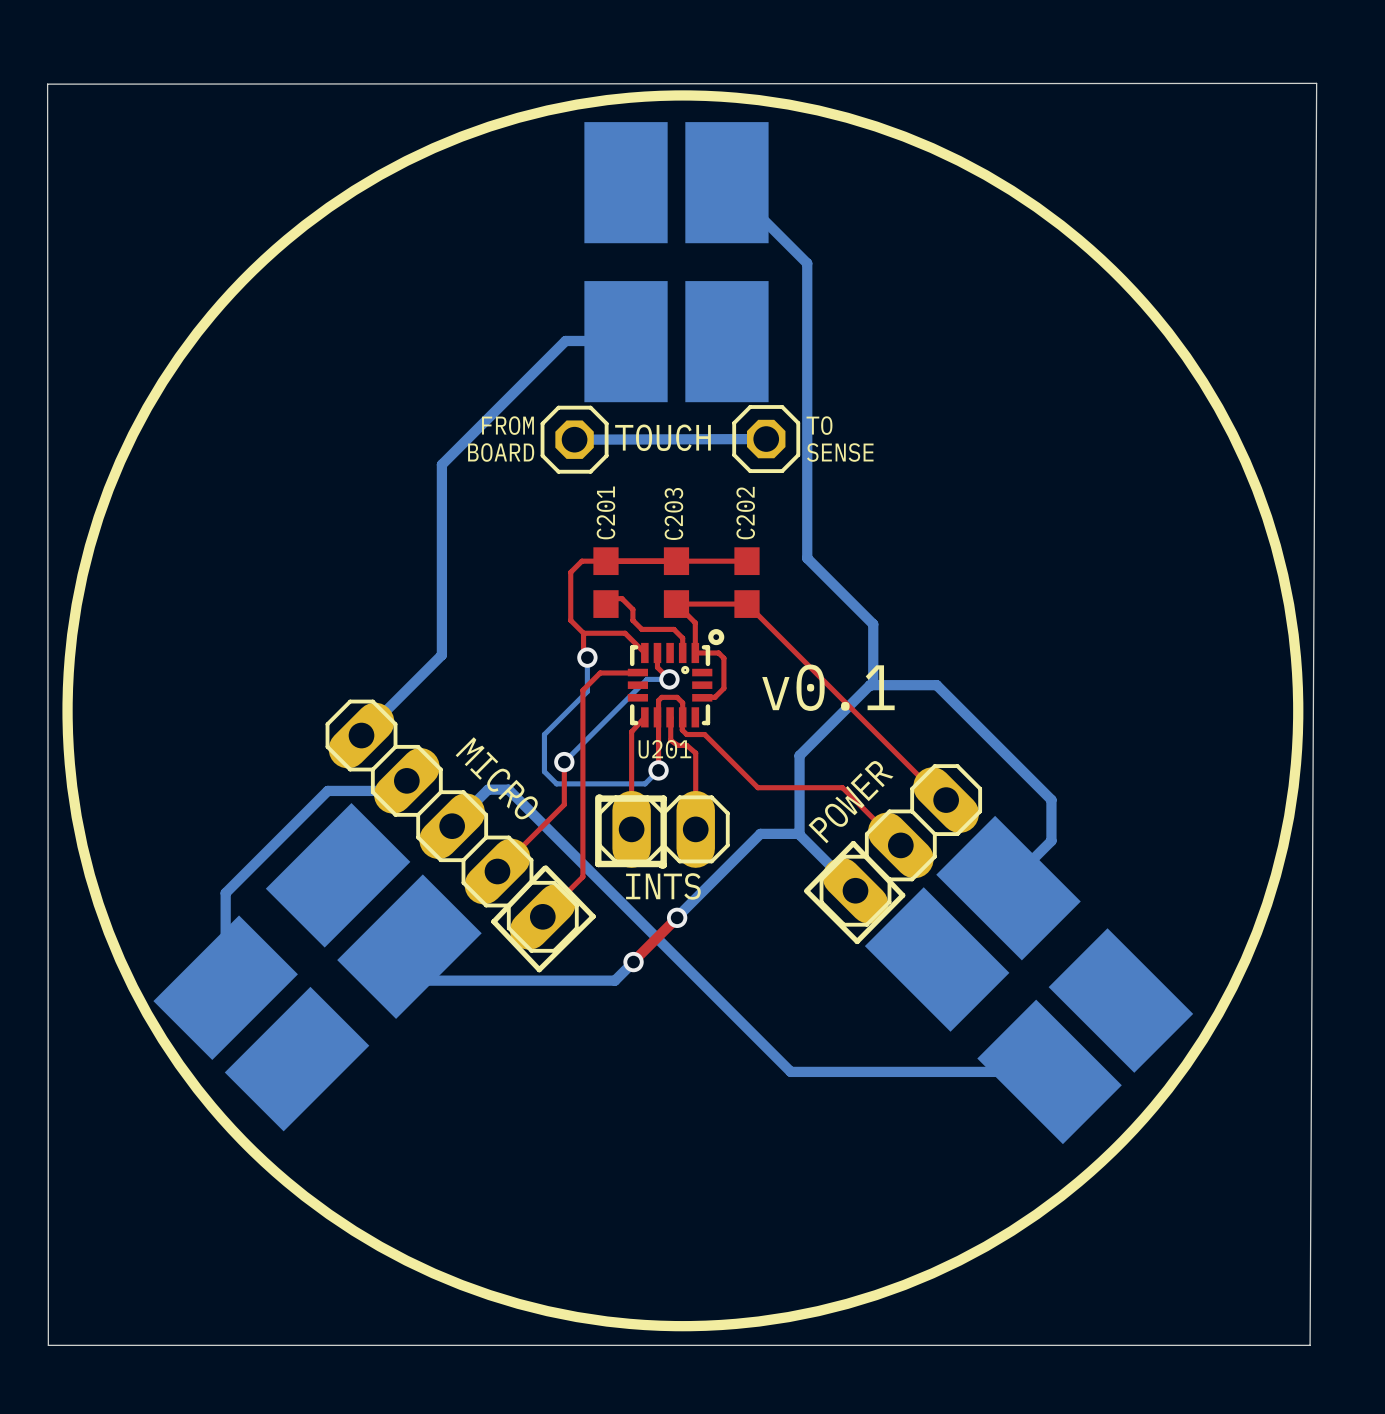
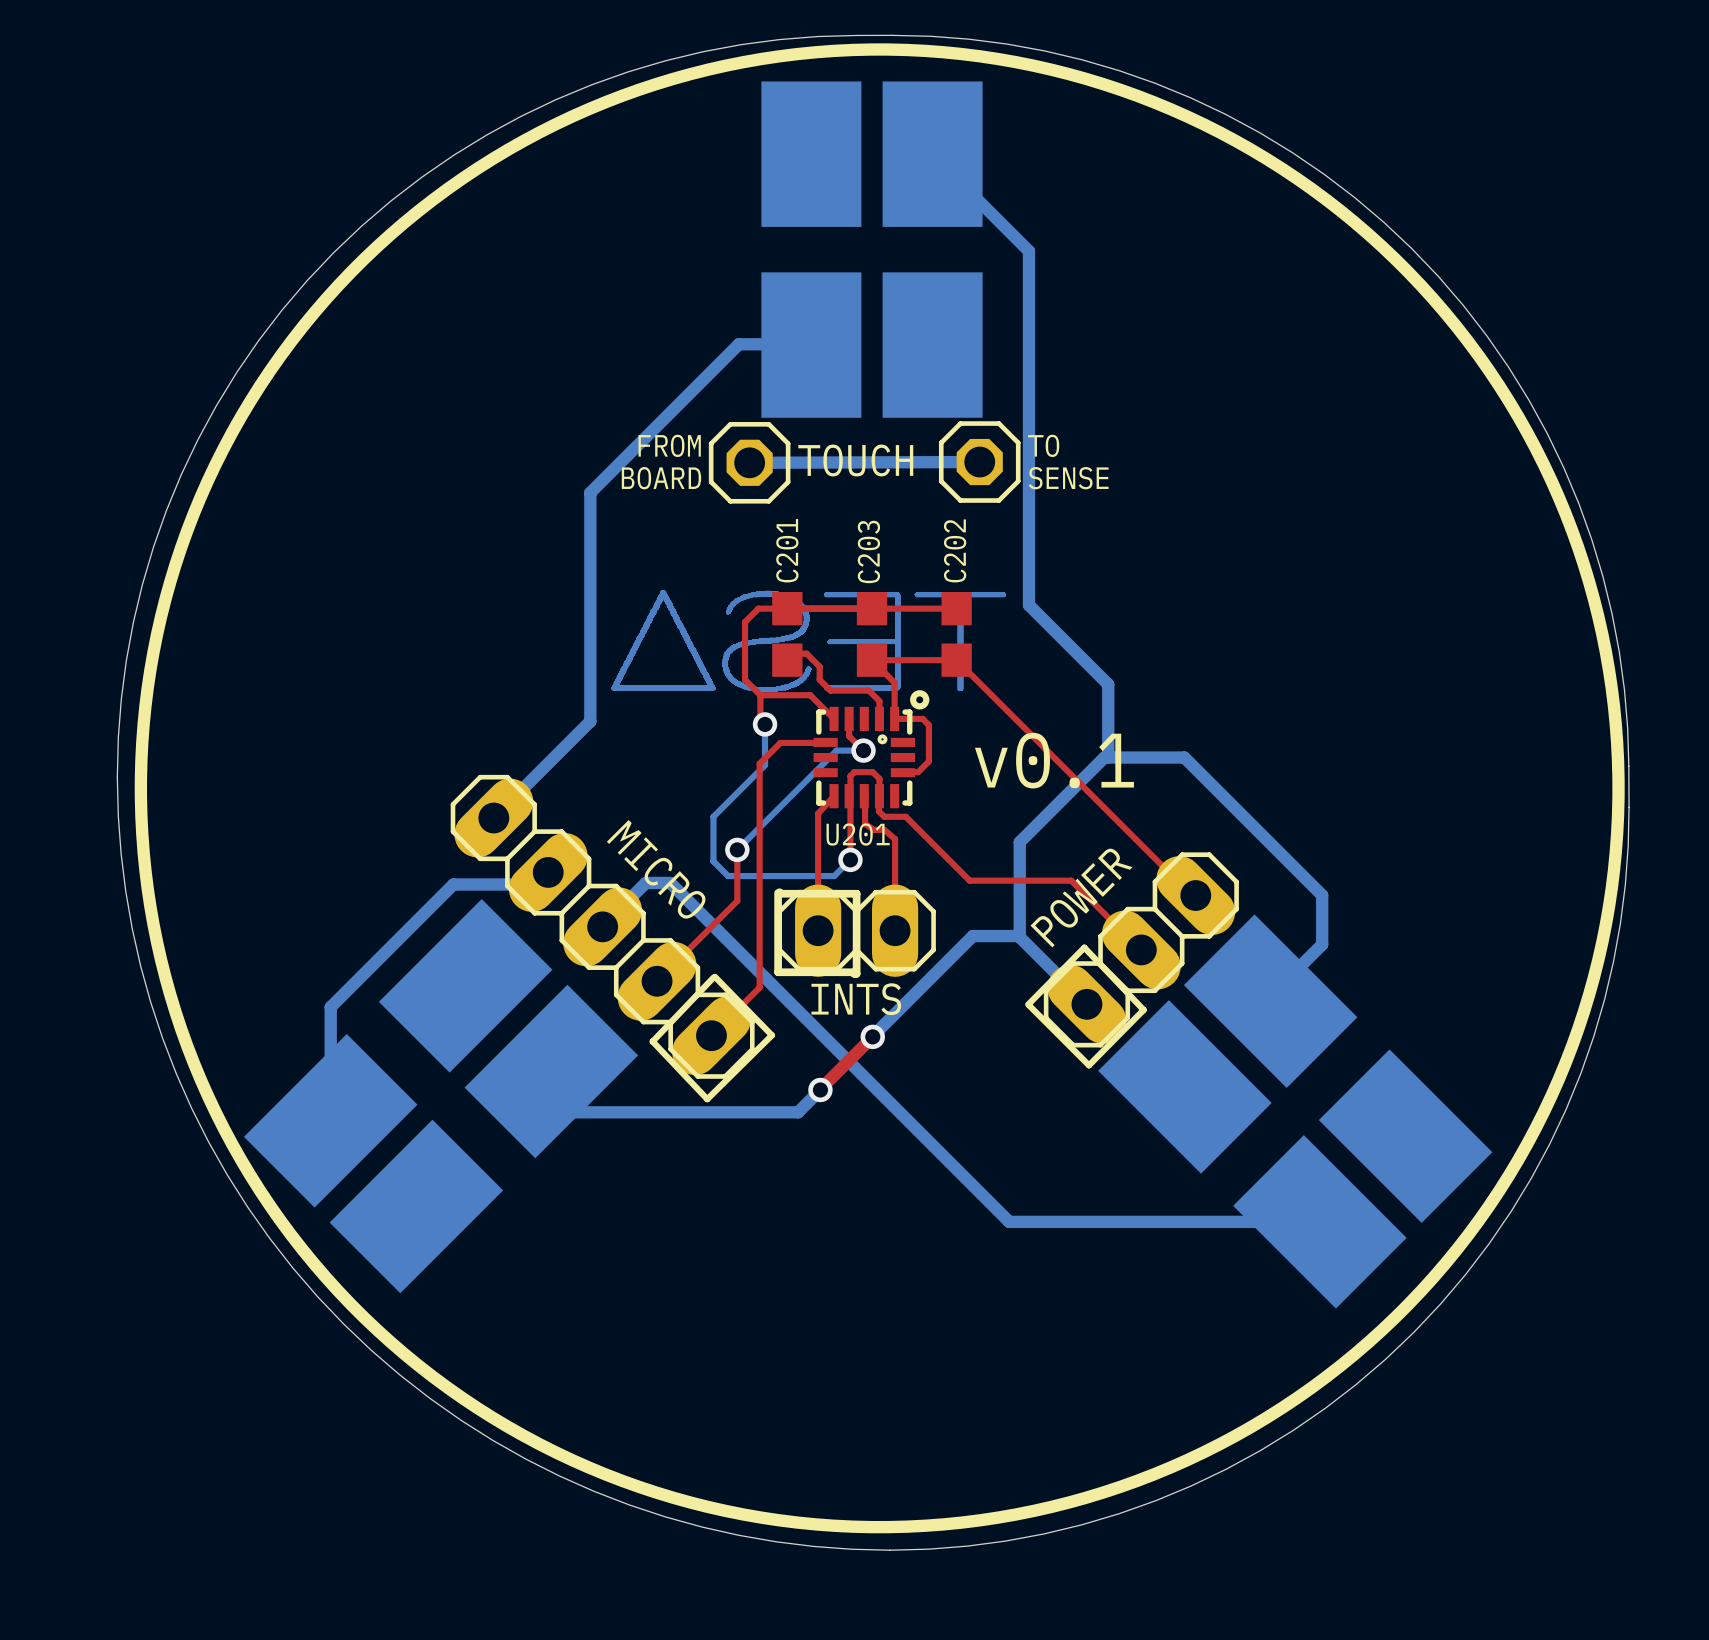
board edge: (1316, 83) (1310, 1345) (48, 1345) (47, 84) (1316, 83) -> (892, 35) (818, 36) (741, 44) (665, 60) (591, 84) (521, 116) (453, 155) (391, 200) (333, 252) (282, 310) (236, 372) (216, 405) (181, 474) (153, 547) (133, 622) (121, 698) (117, 776) (121, 853) (132, 928) (150, 1002) (176, 1073) (208, 1142) (247, 1207) (292, 1267) (343, 1324) (399, 1374) (460, 1420) (525, 1459) (594, 1491) (665, 1516) (739, 1535) (814, 1546) (889, 1550) (967, 1546) (1043, 1533) (1081, 1524) (1155, 1500) (1226, 1469) (1293, 1430) (1356, 1384) (1413, 1332) (1465, 1274) (1511, 1211) (1531, 1178) (1566, 1109) (1593, 1036) (1613, 961) (1625, 884) (1629, 807) (1627, 727) (1619, 651) (1602, 576) (1578, 503) (1547, 433) (1508, 367) (1486, 335) (1438, 276) (1383, 222) (1323, 174) (1259, 132) (1190, 97) (1119, 70) (1044, 50) (969, 39) (892, 35)
drawing: none -> [611, 590, 1006, 692]

